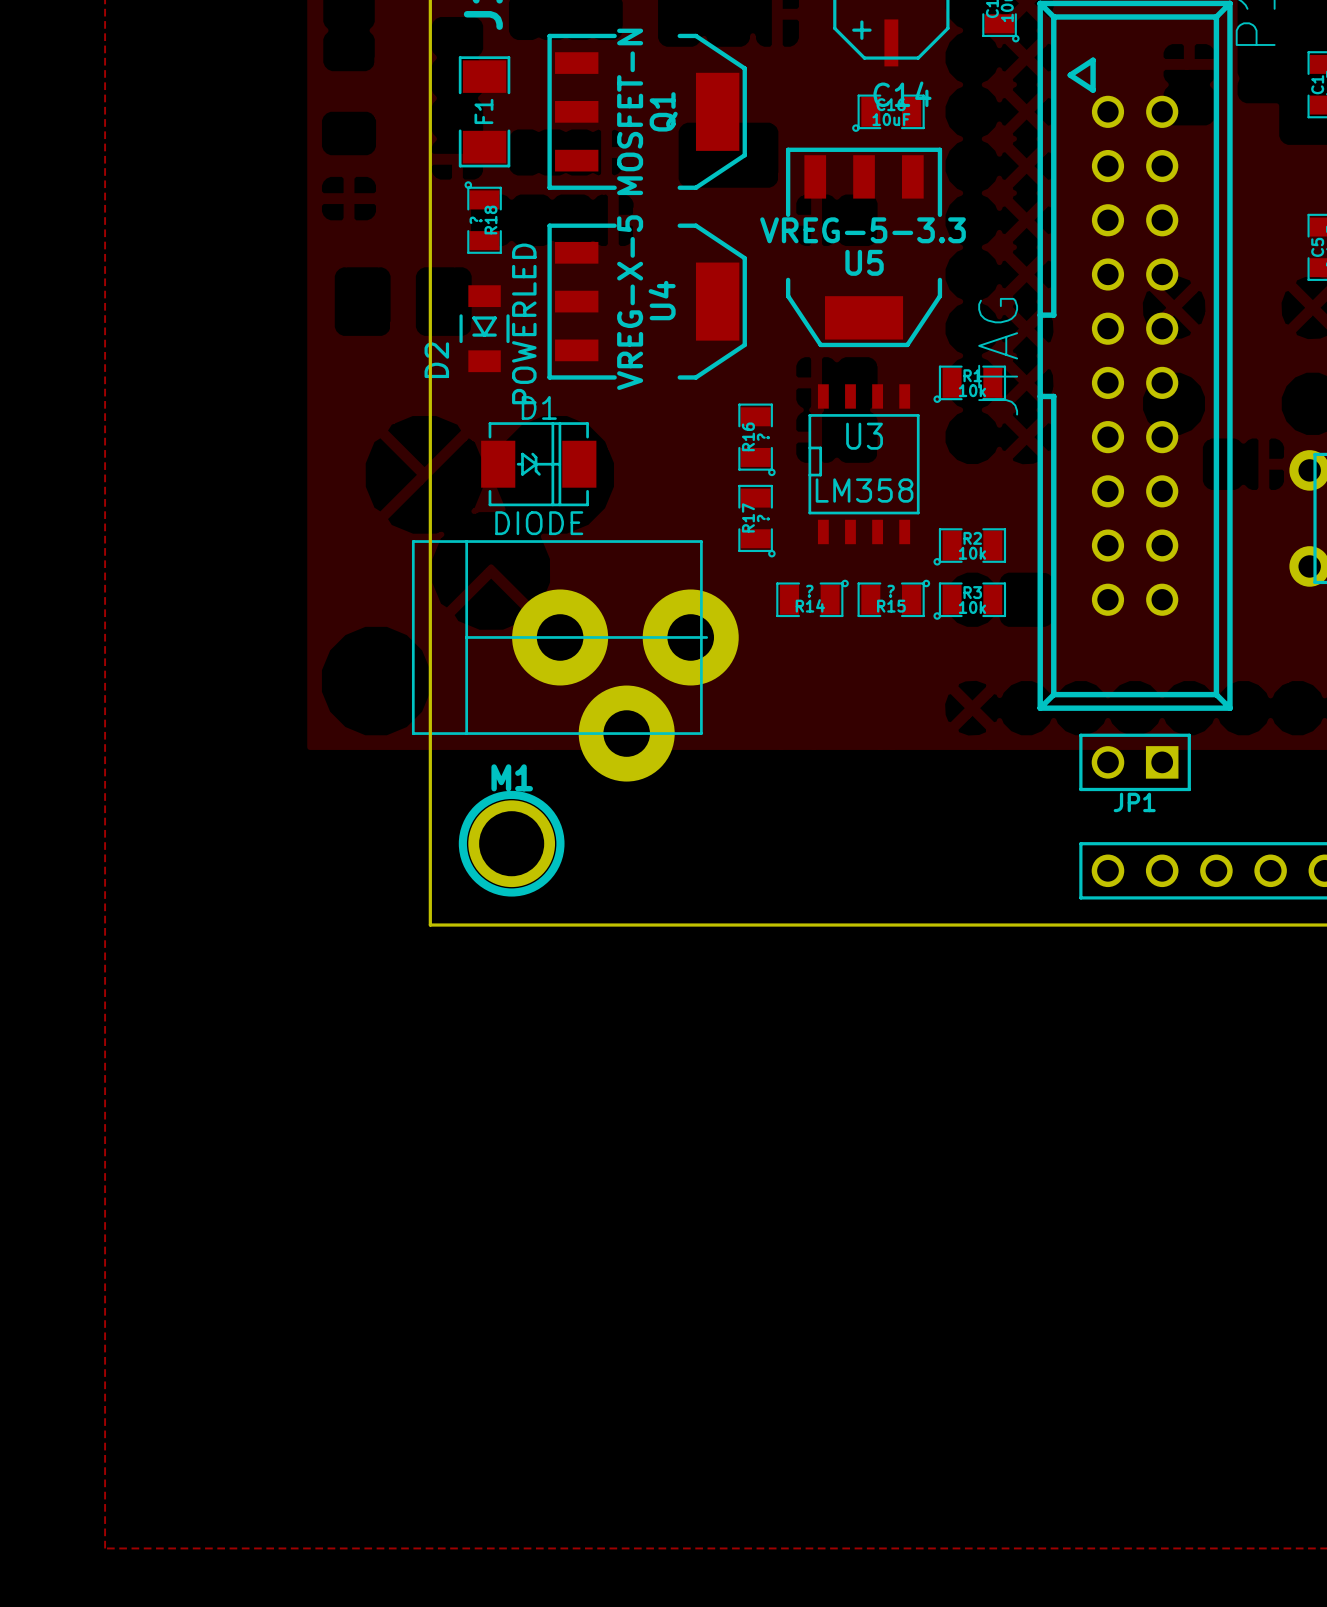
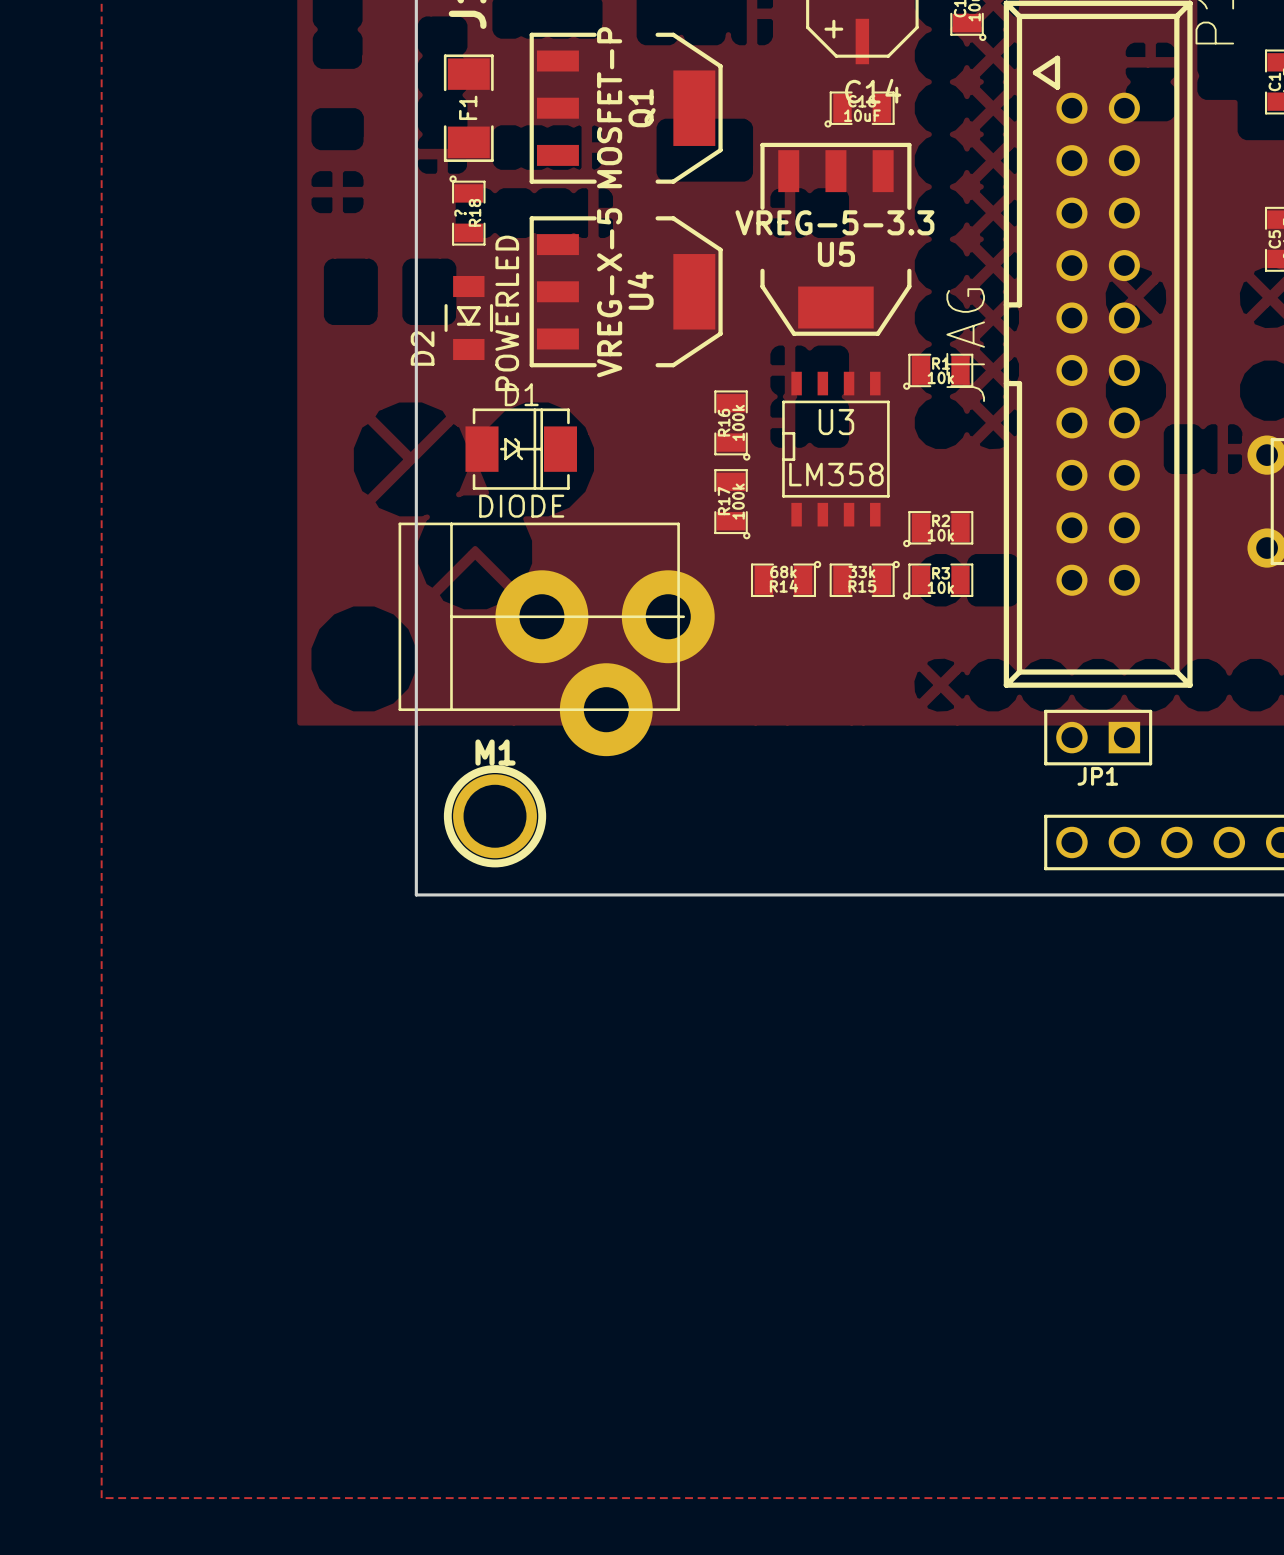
Q1 value: MOSFET-N (630, 111) -> MOSFET-P (609, 107)
R16 value: ? (763, 437) -> 100k (738, 422)
R17 value: ? (763, 518) -> 100k (738, 501)
R14 value: ? (809, 591) -> 68k (783, 571)
R15 value: ? (891, 591) -> 33k (861, 571)

